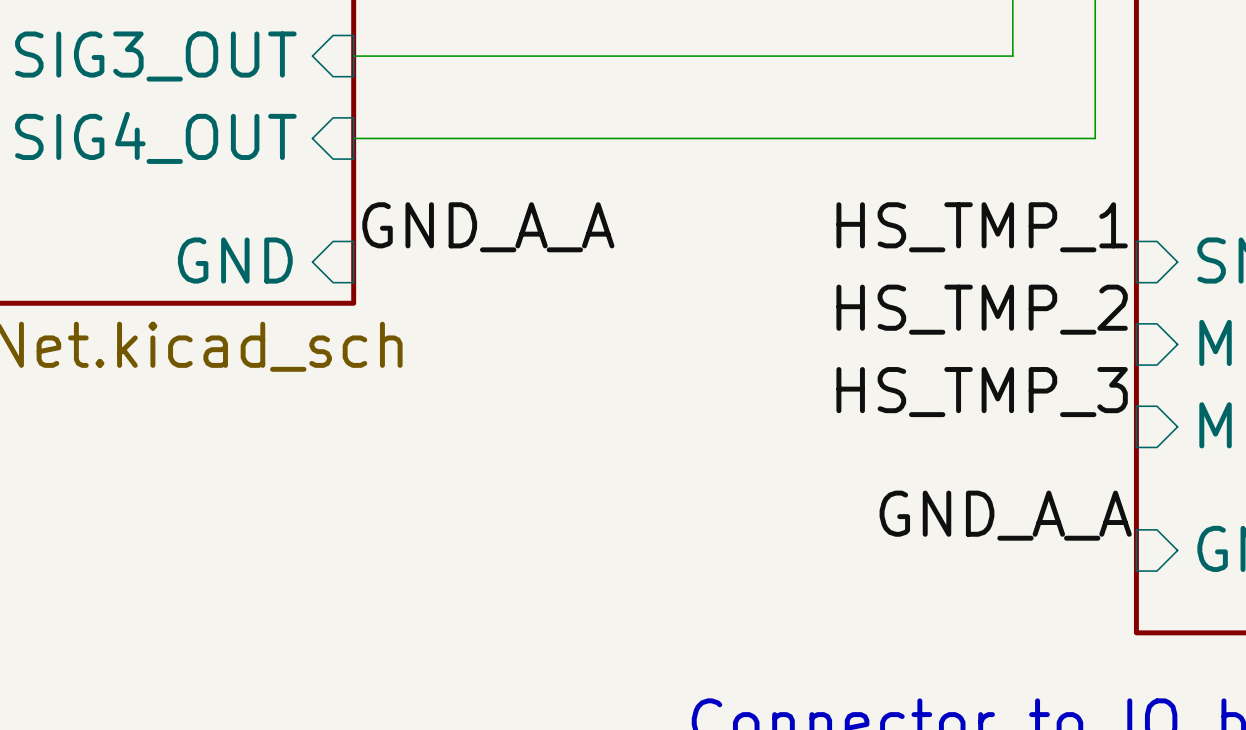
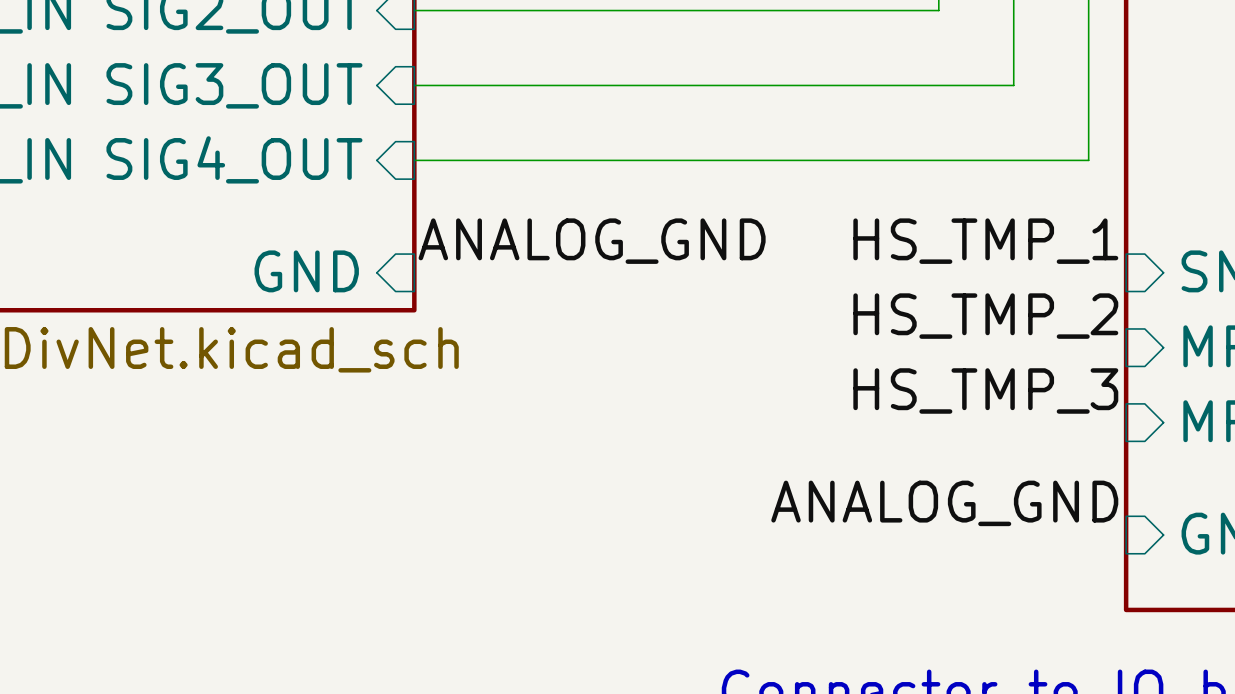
label: GND_A_A (488, 227) -> ANALOG_GND (592, 241)
label: GND_A_A (1005, 515) -> ANALOG_GND (944, 503)

